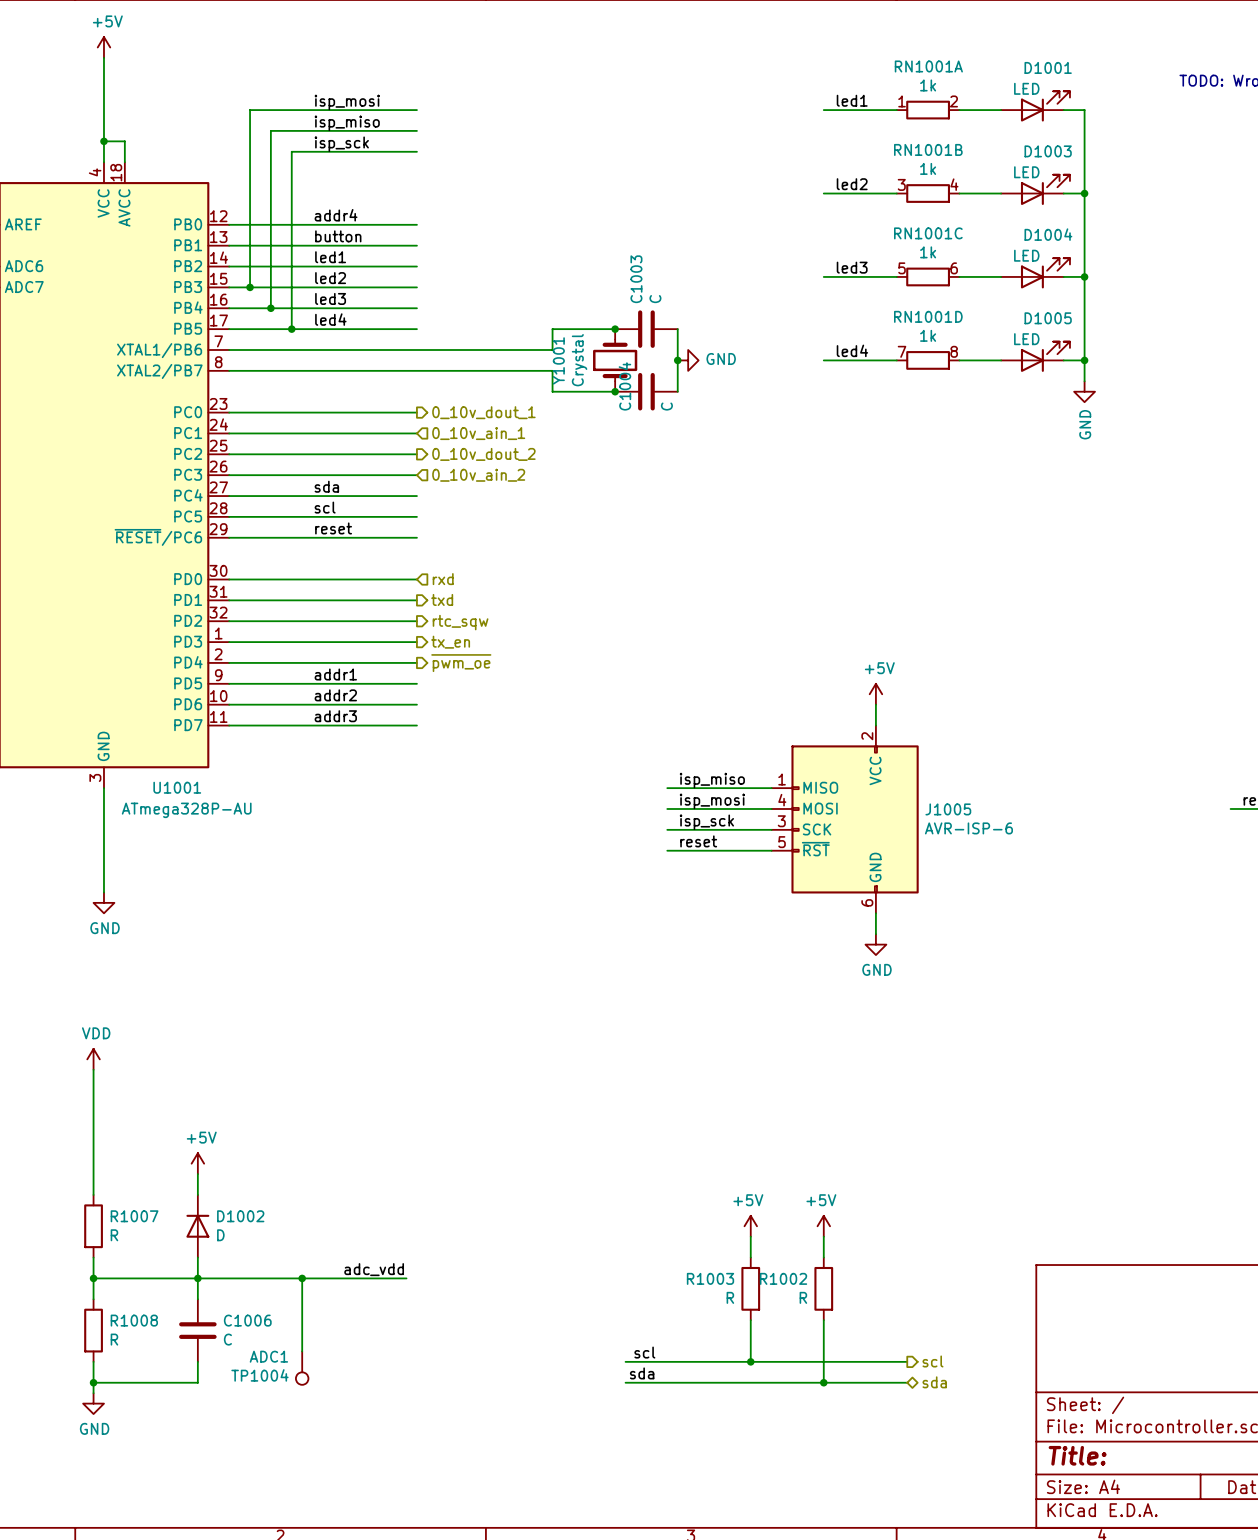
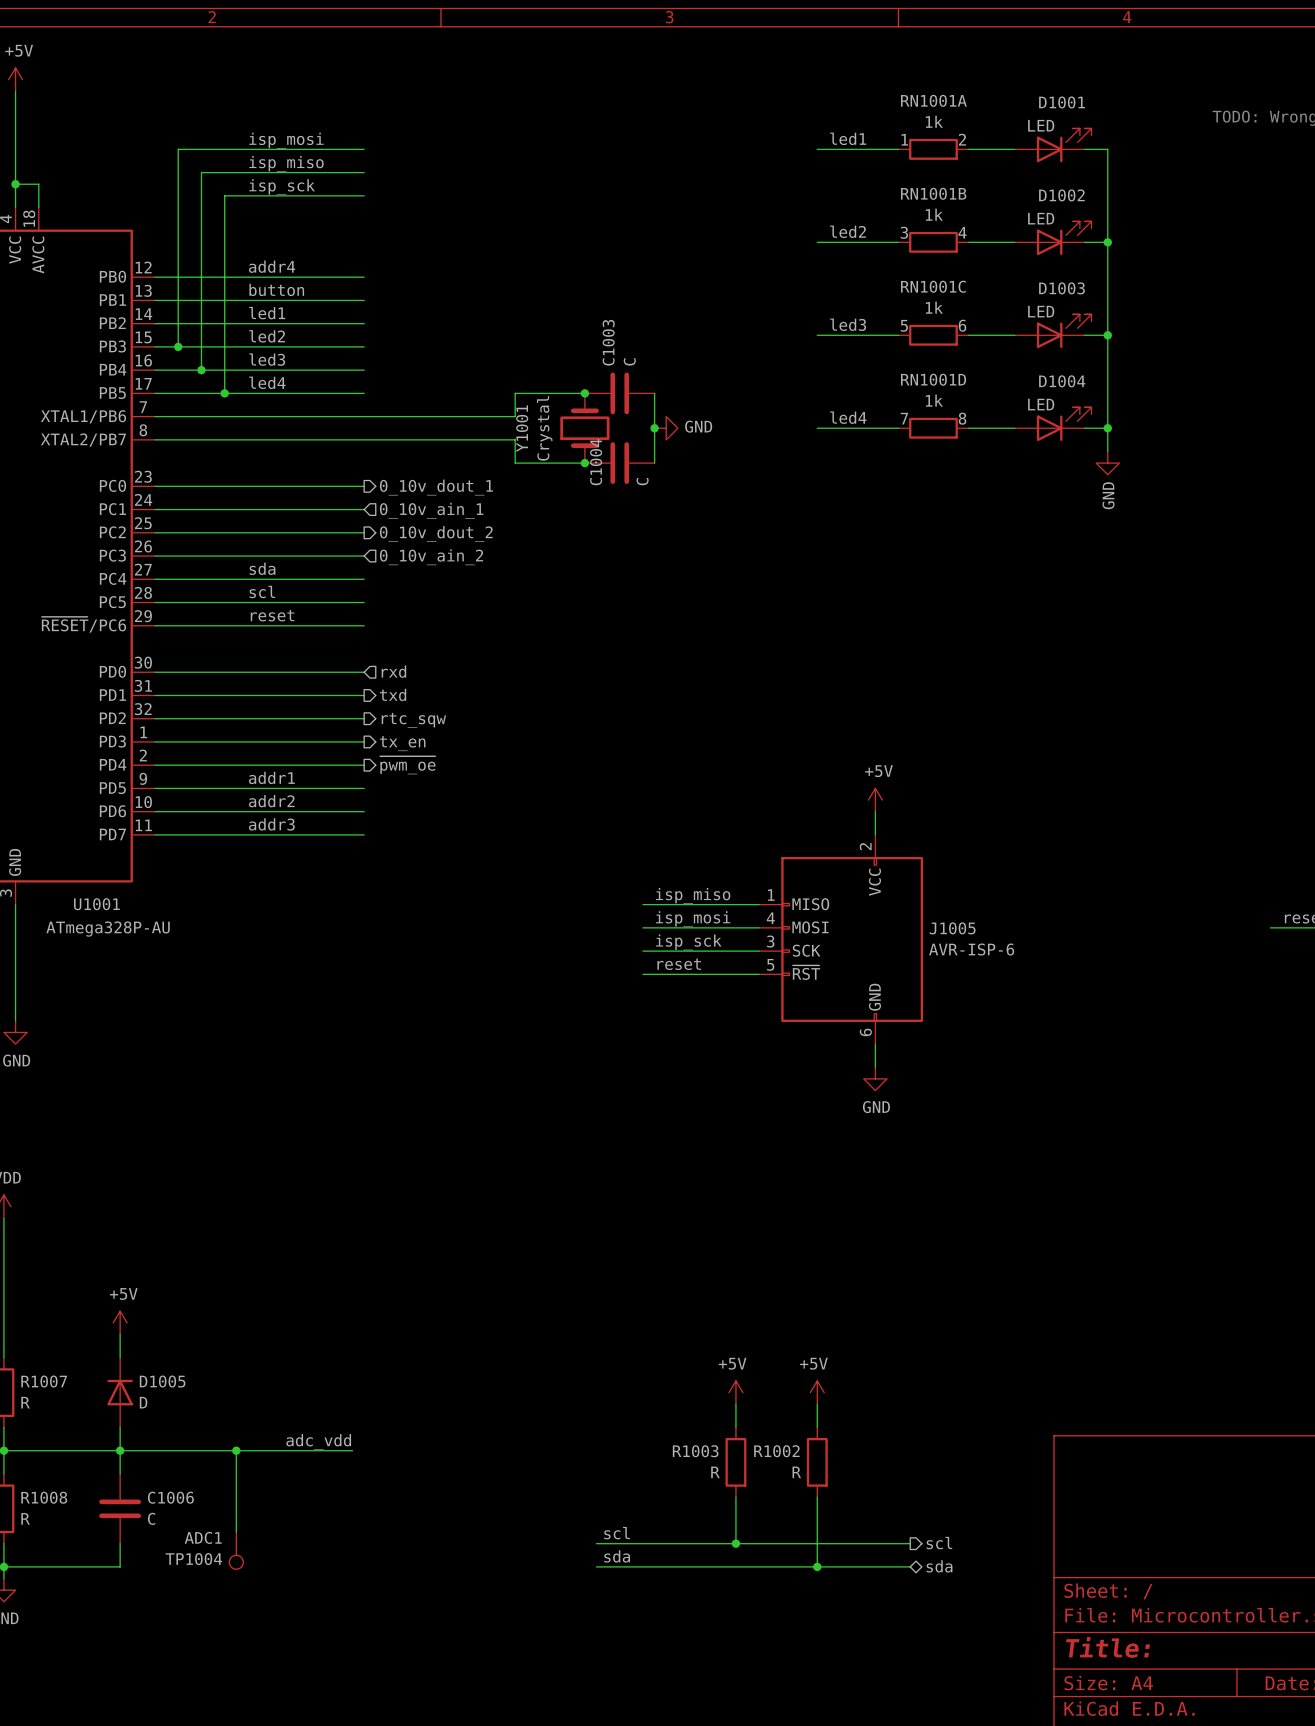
D1003 name: D1003 (1048, 151) -> D1002 (1061, 195)
D1004 name: D1004 (1048, 234) -> D1003 (1061, 288)
D1005 name: D1005 (1048, 318) -> D1004 (1062, 381)
D1002 name: D1002 (240, 1216) -> D1005 (162, 1381)

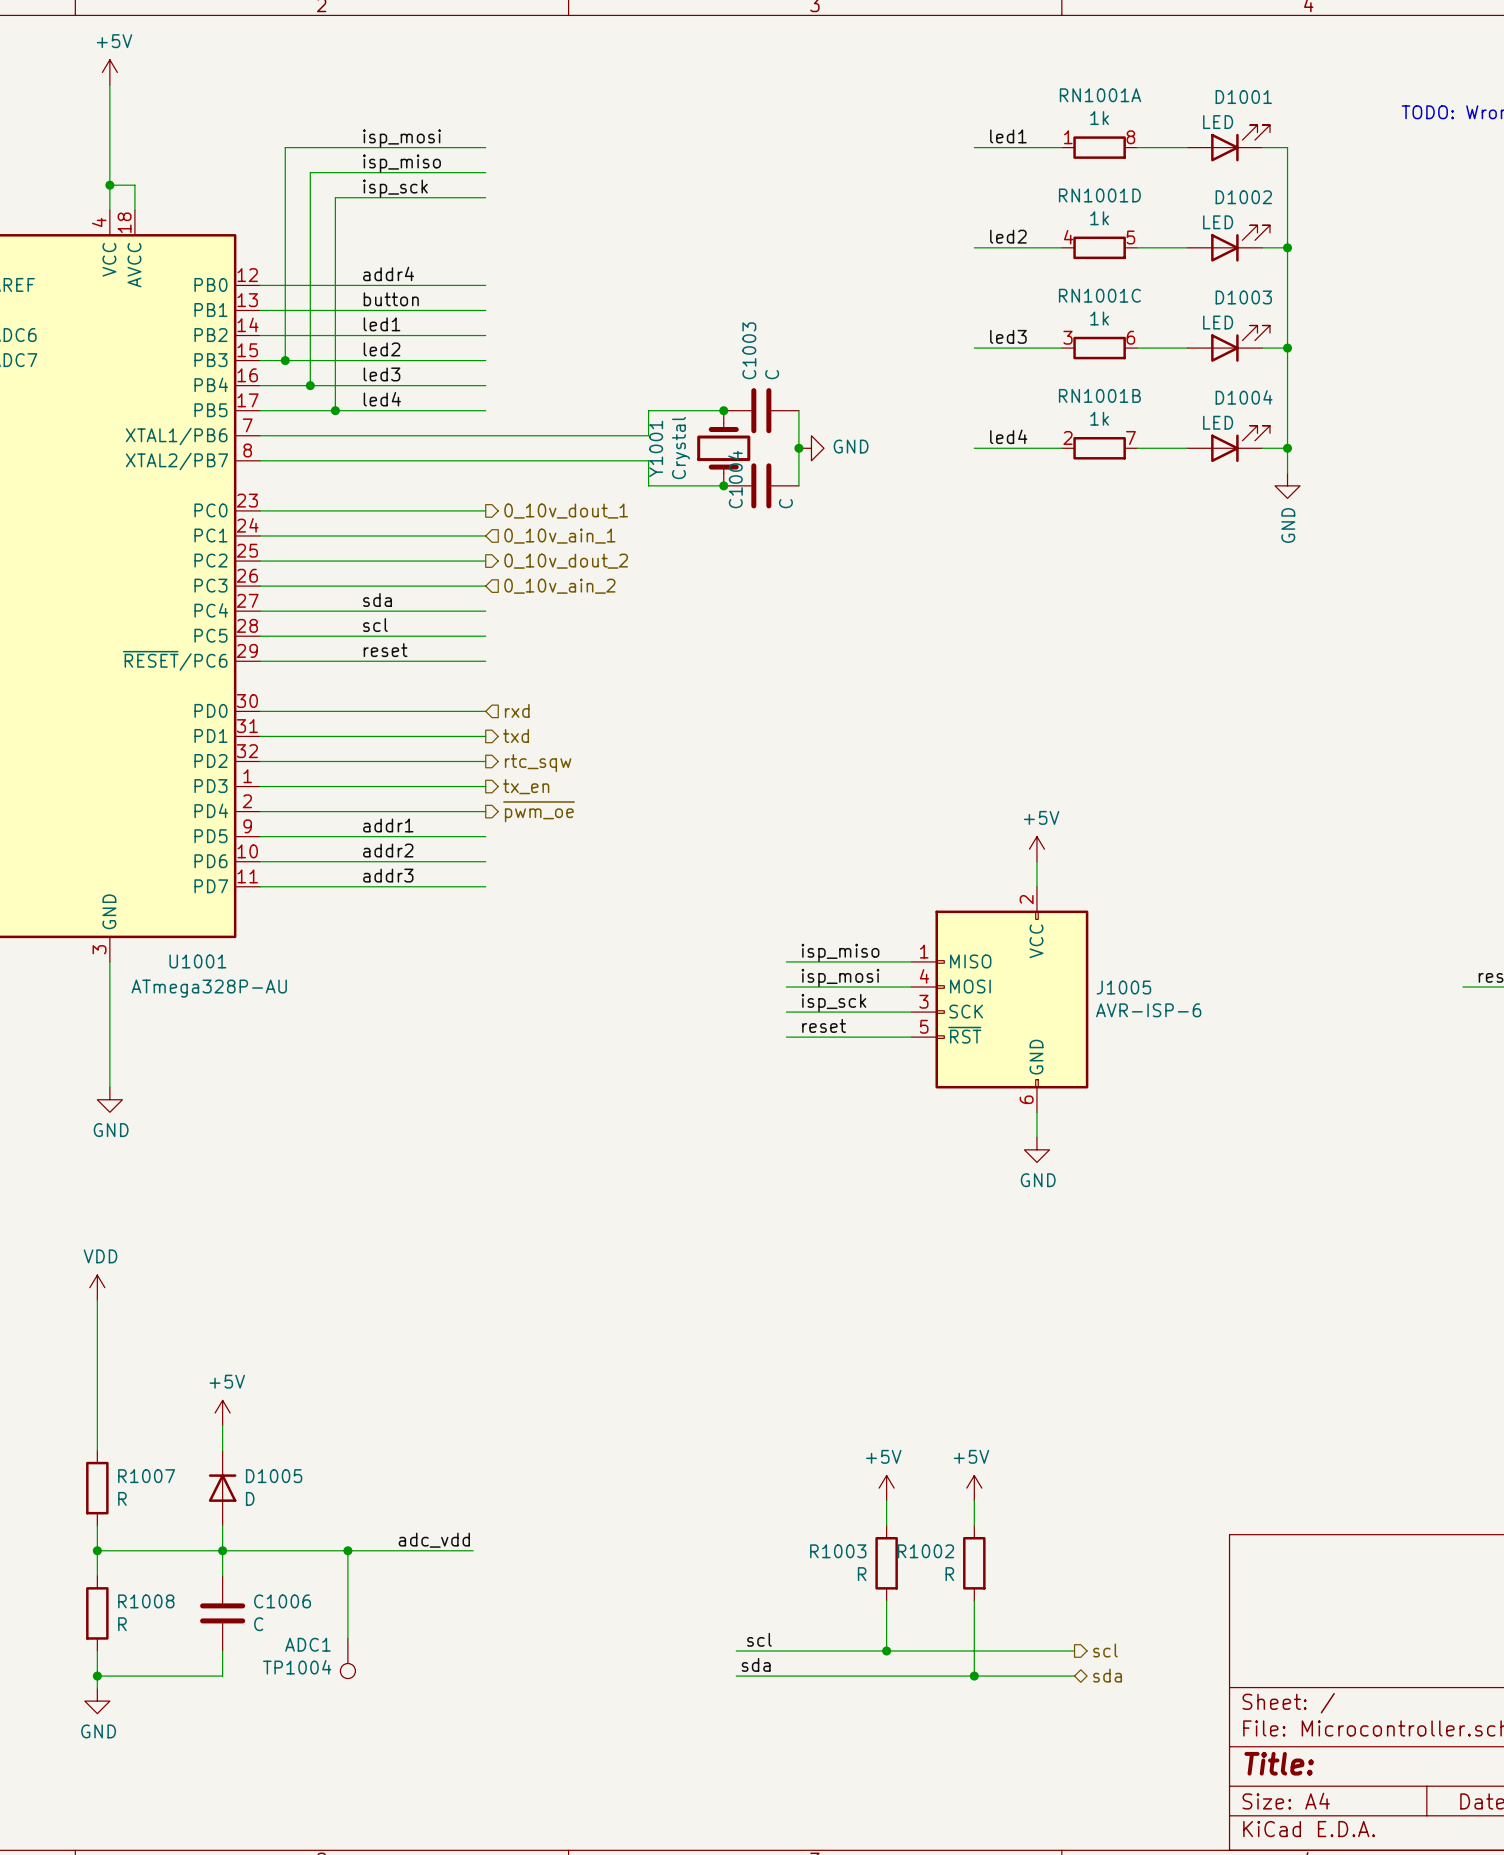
RN1001A pin number: 2 (962, 139) -> 8 (1130, 137)
RN1001B pin number: 3 (904, 232) -> 2 (1067, 437)
RN1001B pin number: 4 (962, 232) -> 7 (1130, 437)
RN1001B position: (933, 242) -> (1099, 448)
RN1001C pin number: 5 (904, 325) -> 3 (1067, 337)
RN1001D pin number: 7 (904, 418) -> 4 (1068, 237)
RN1001D pin number: 8 (962, 418) -> 5 (1130, 237)
RN1001D position: (933, 428) -> (1099, 247)

